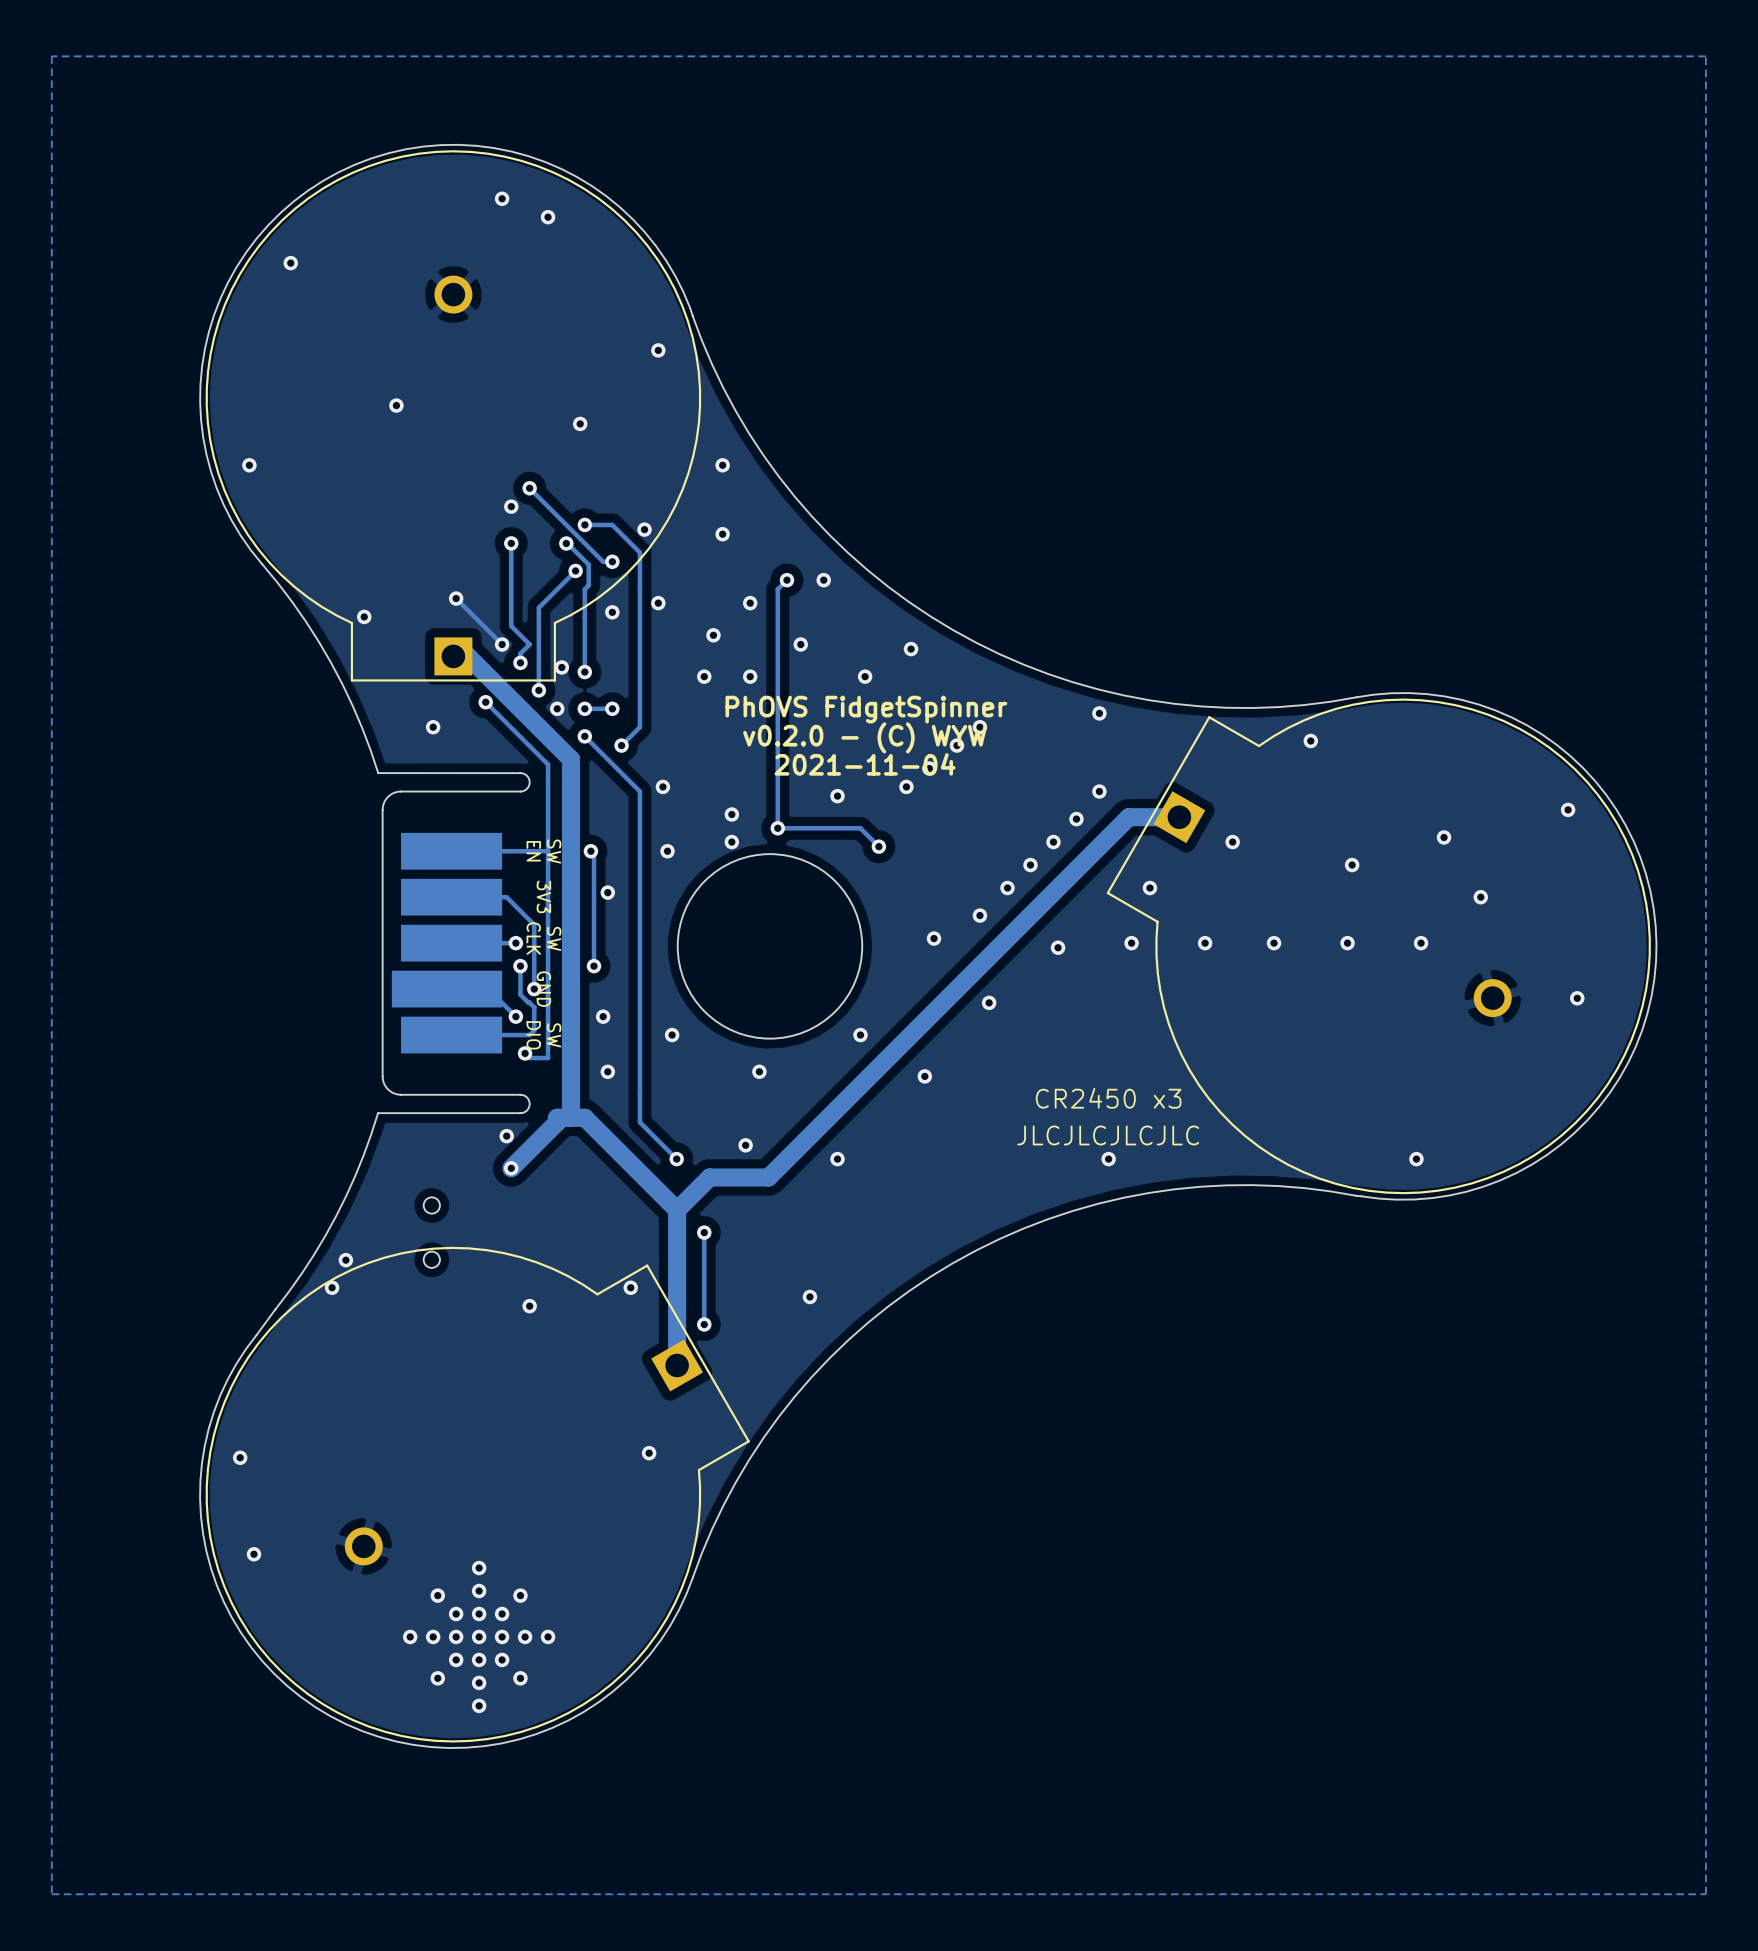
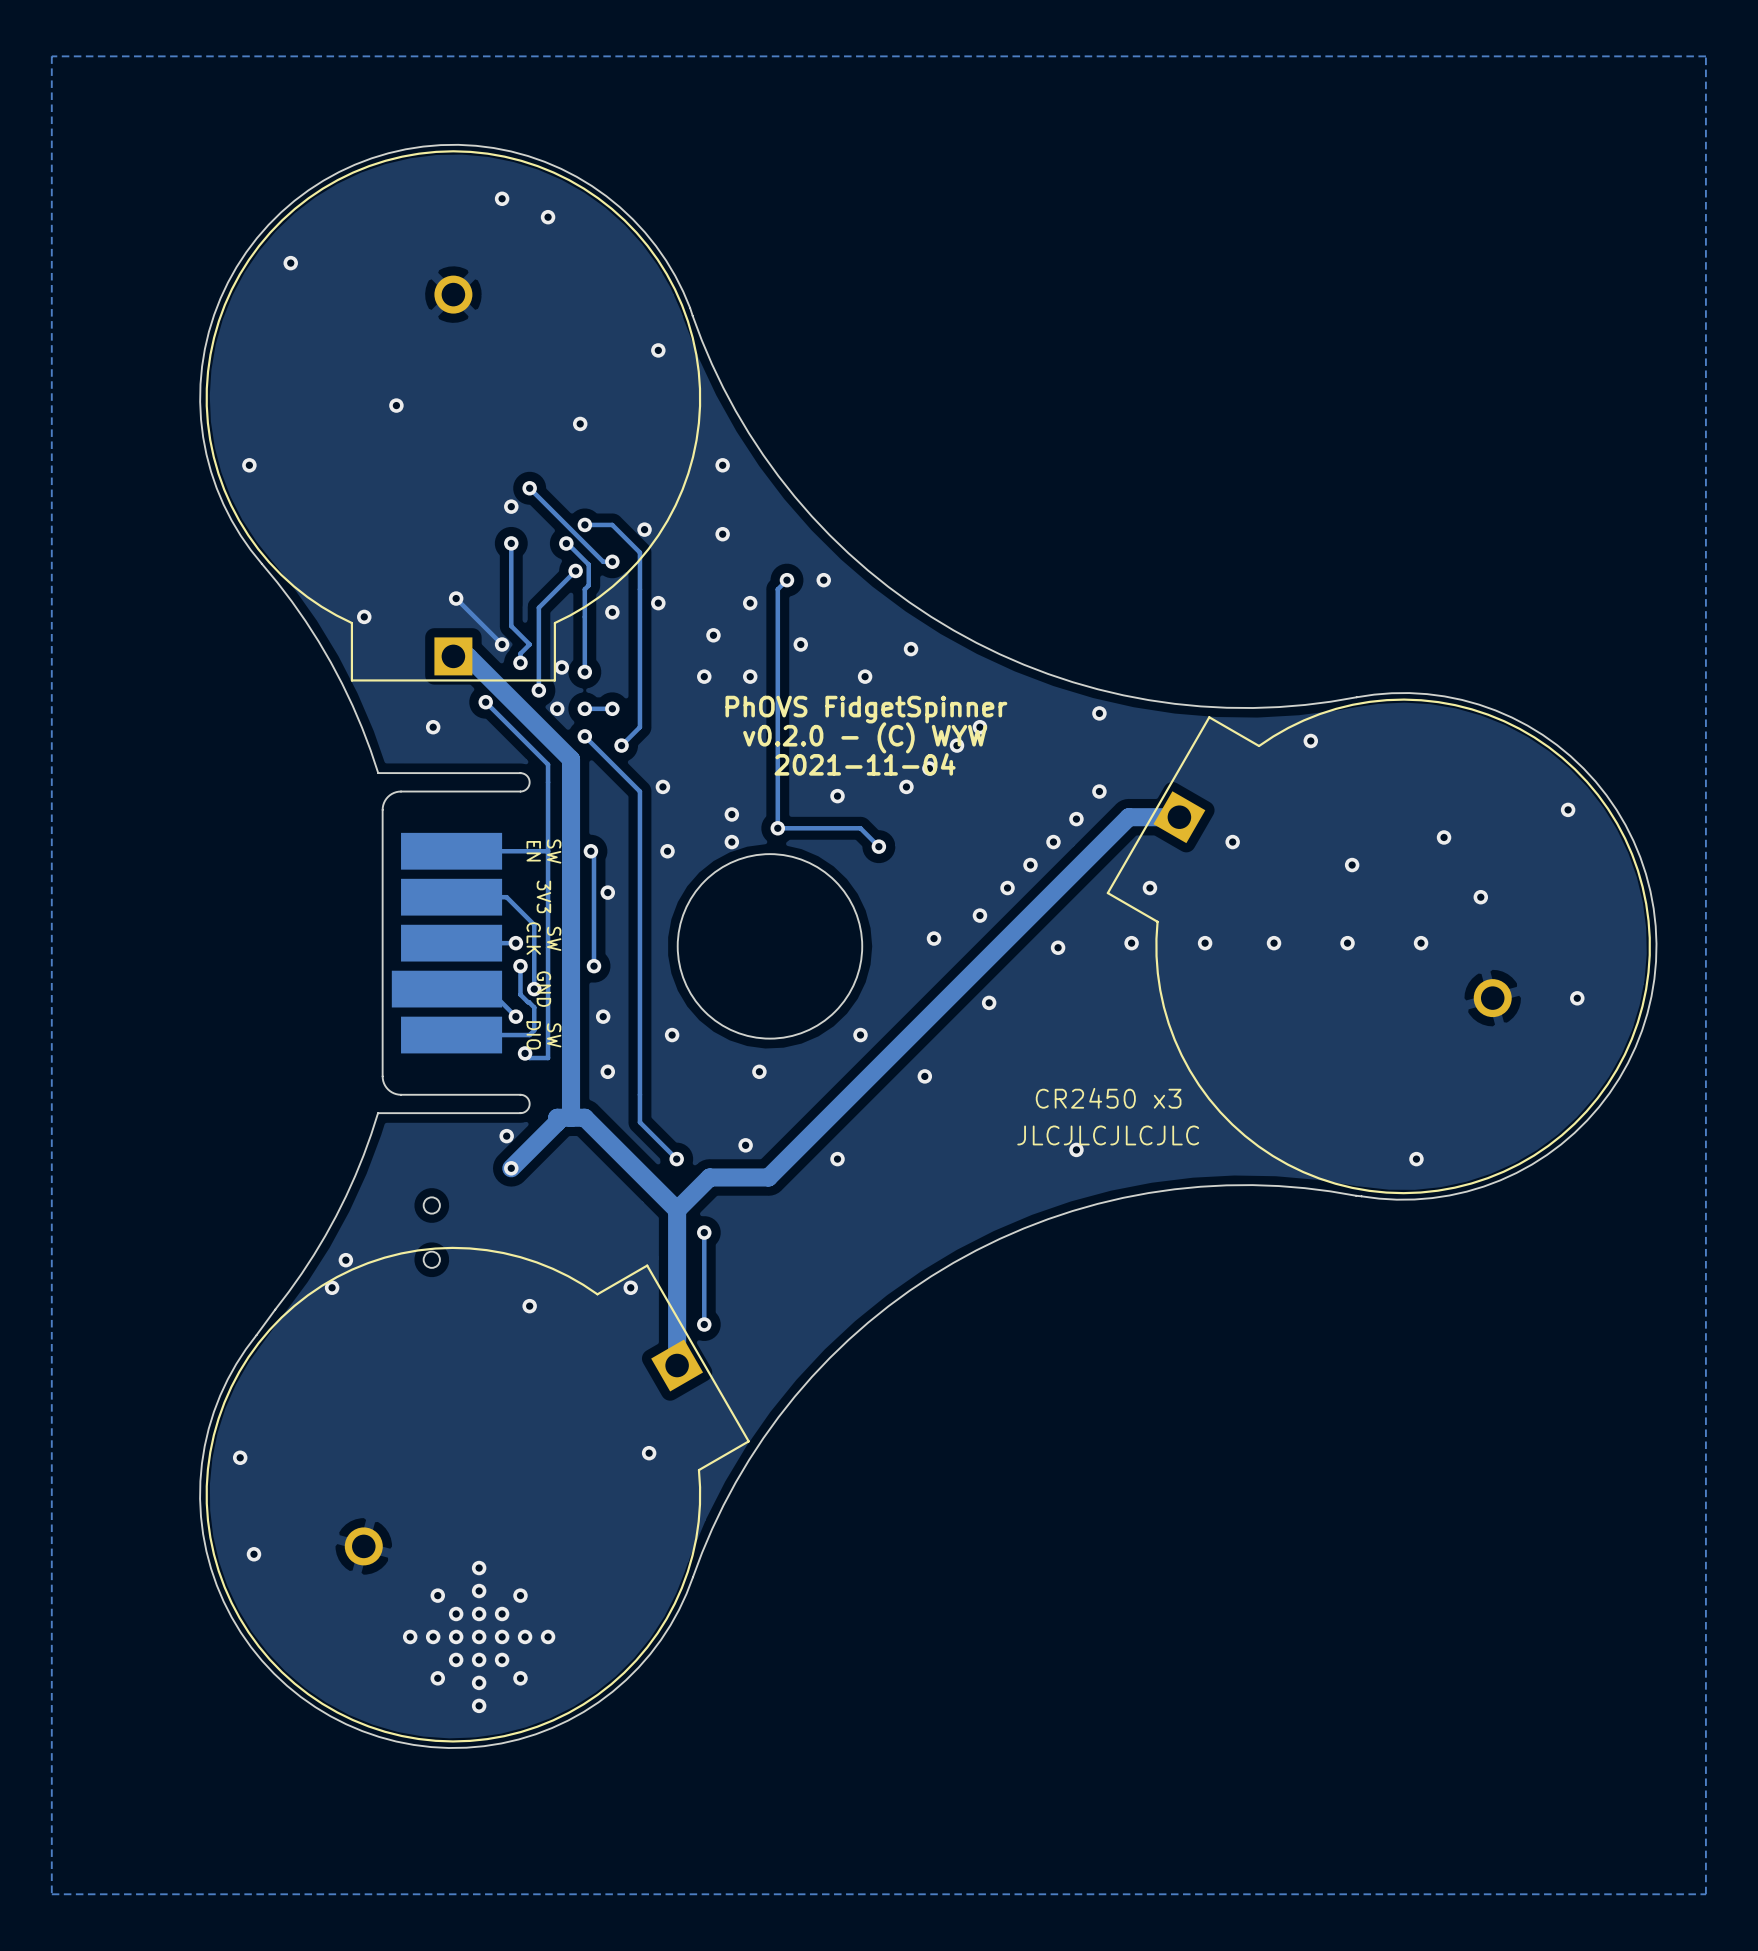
via position: (1108, 1159) -> (1076, 1149)
via: (809, 1296) -> none

